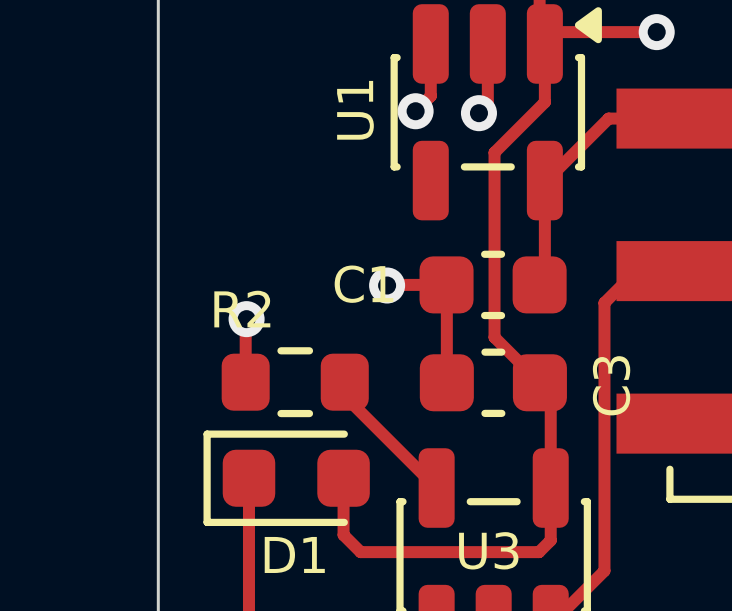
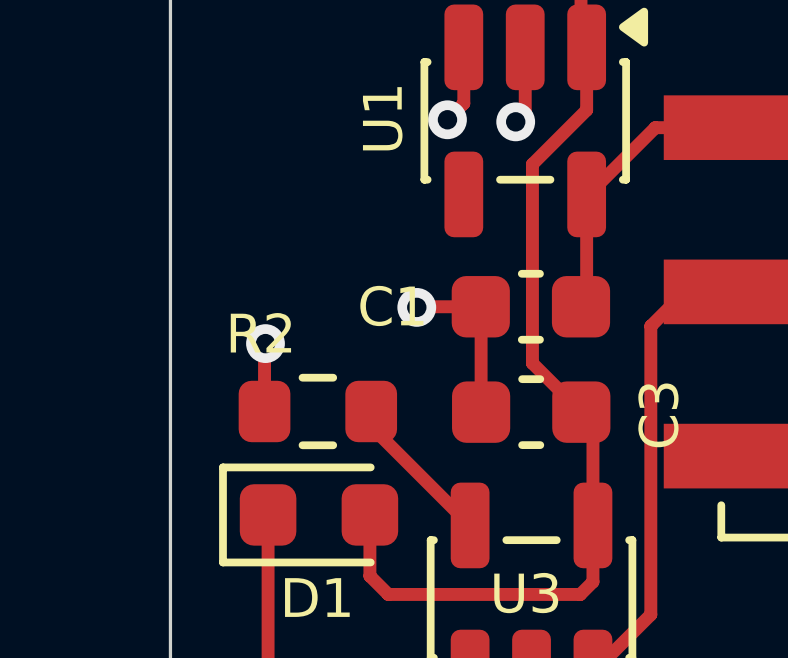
track: (656, 32) (556, 32) (544, 43) -> none
via: (656, 32) -> none

